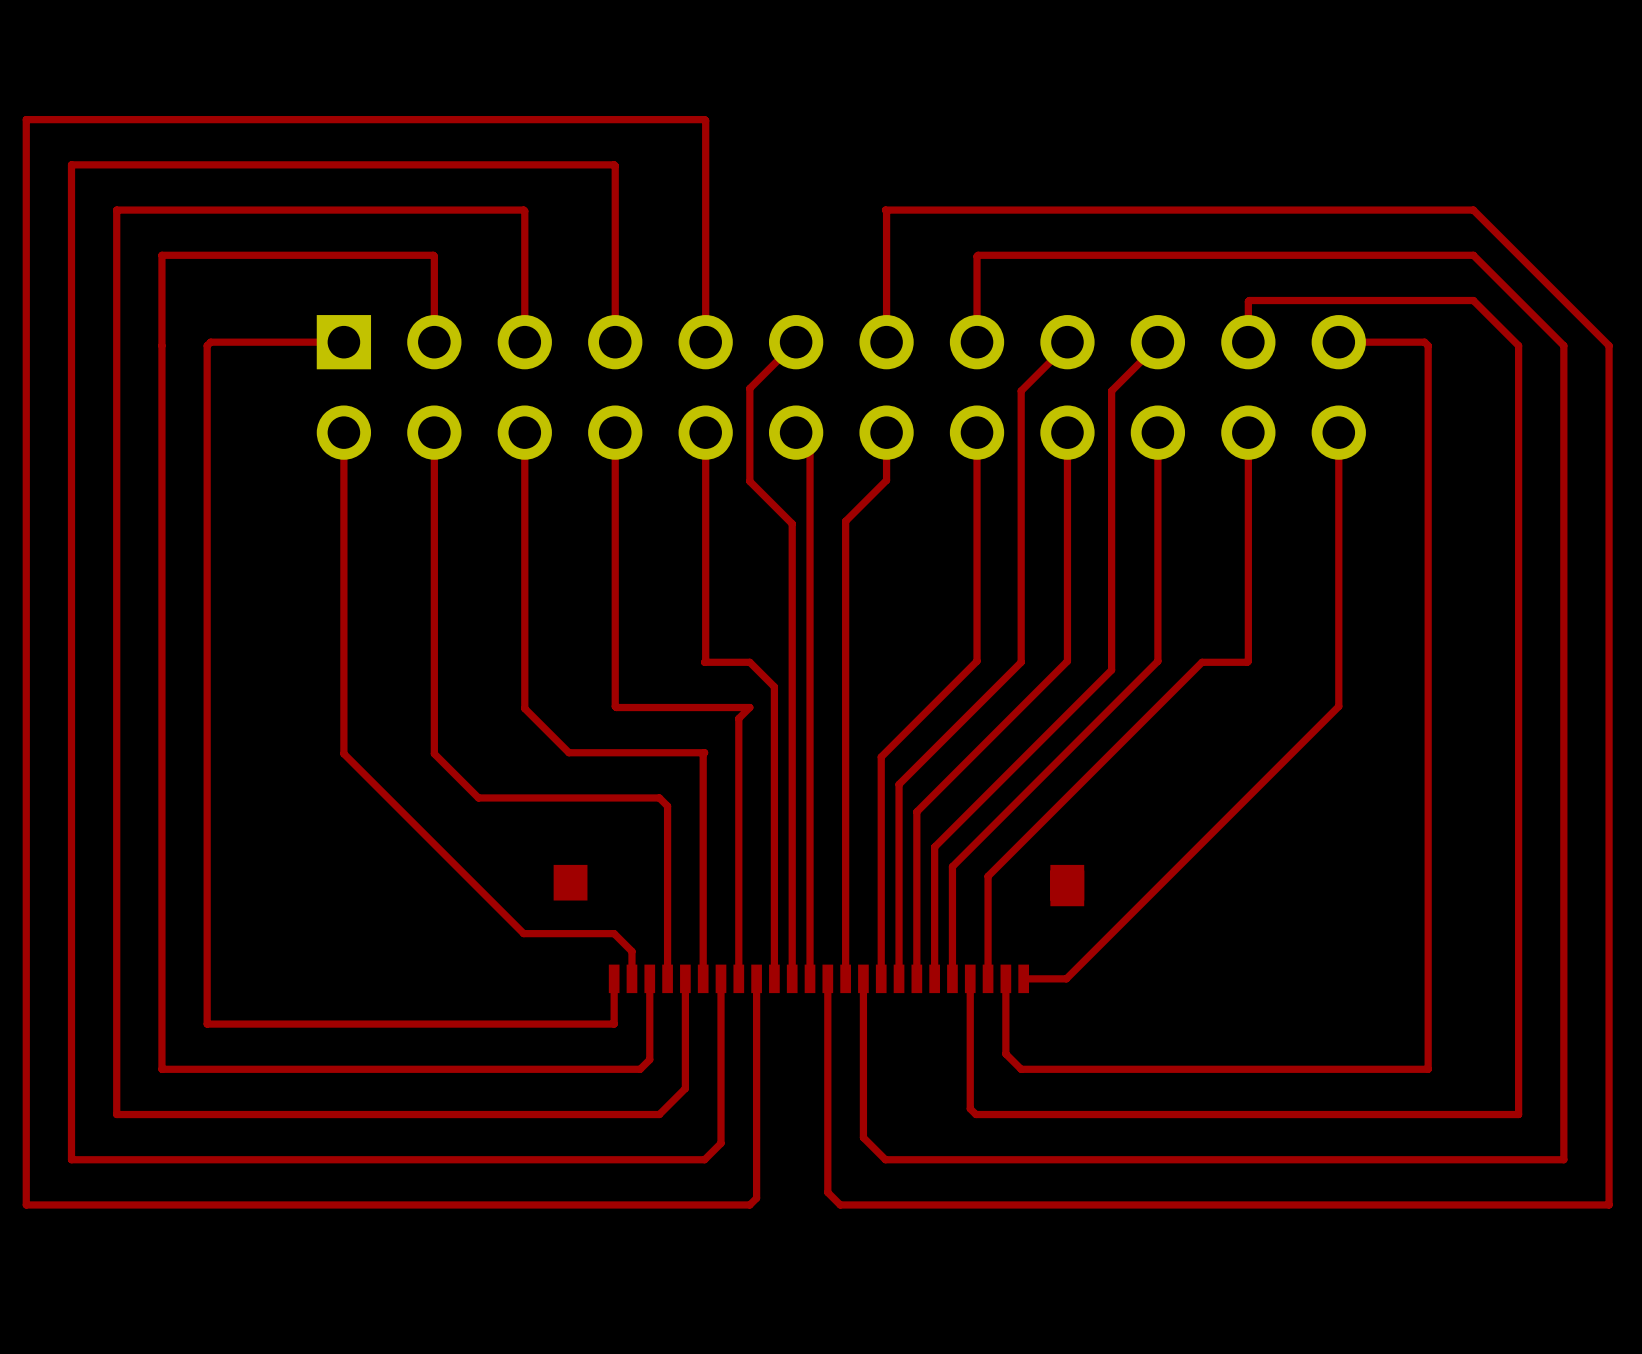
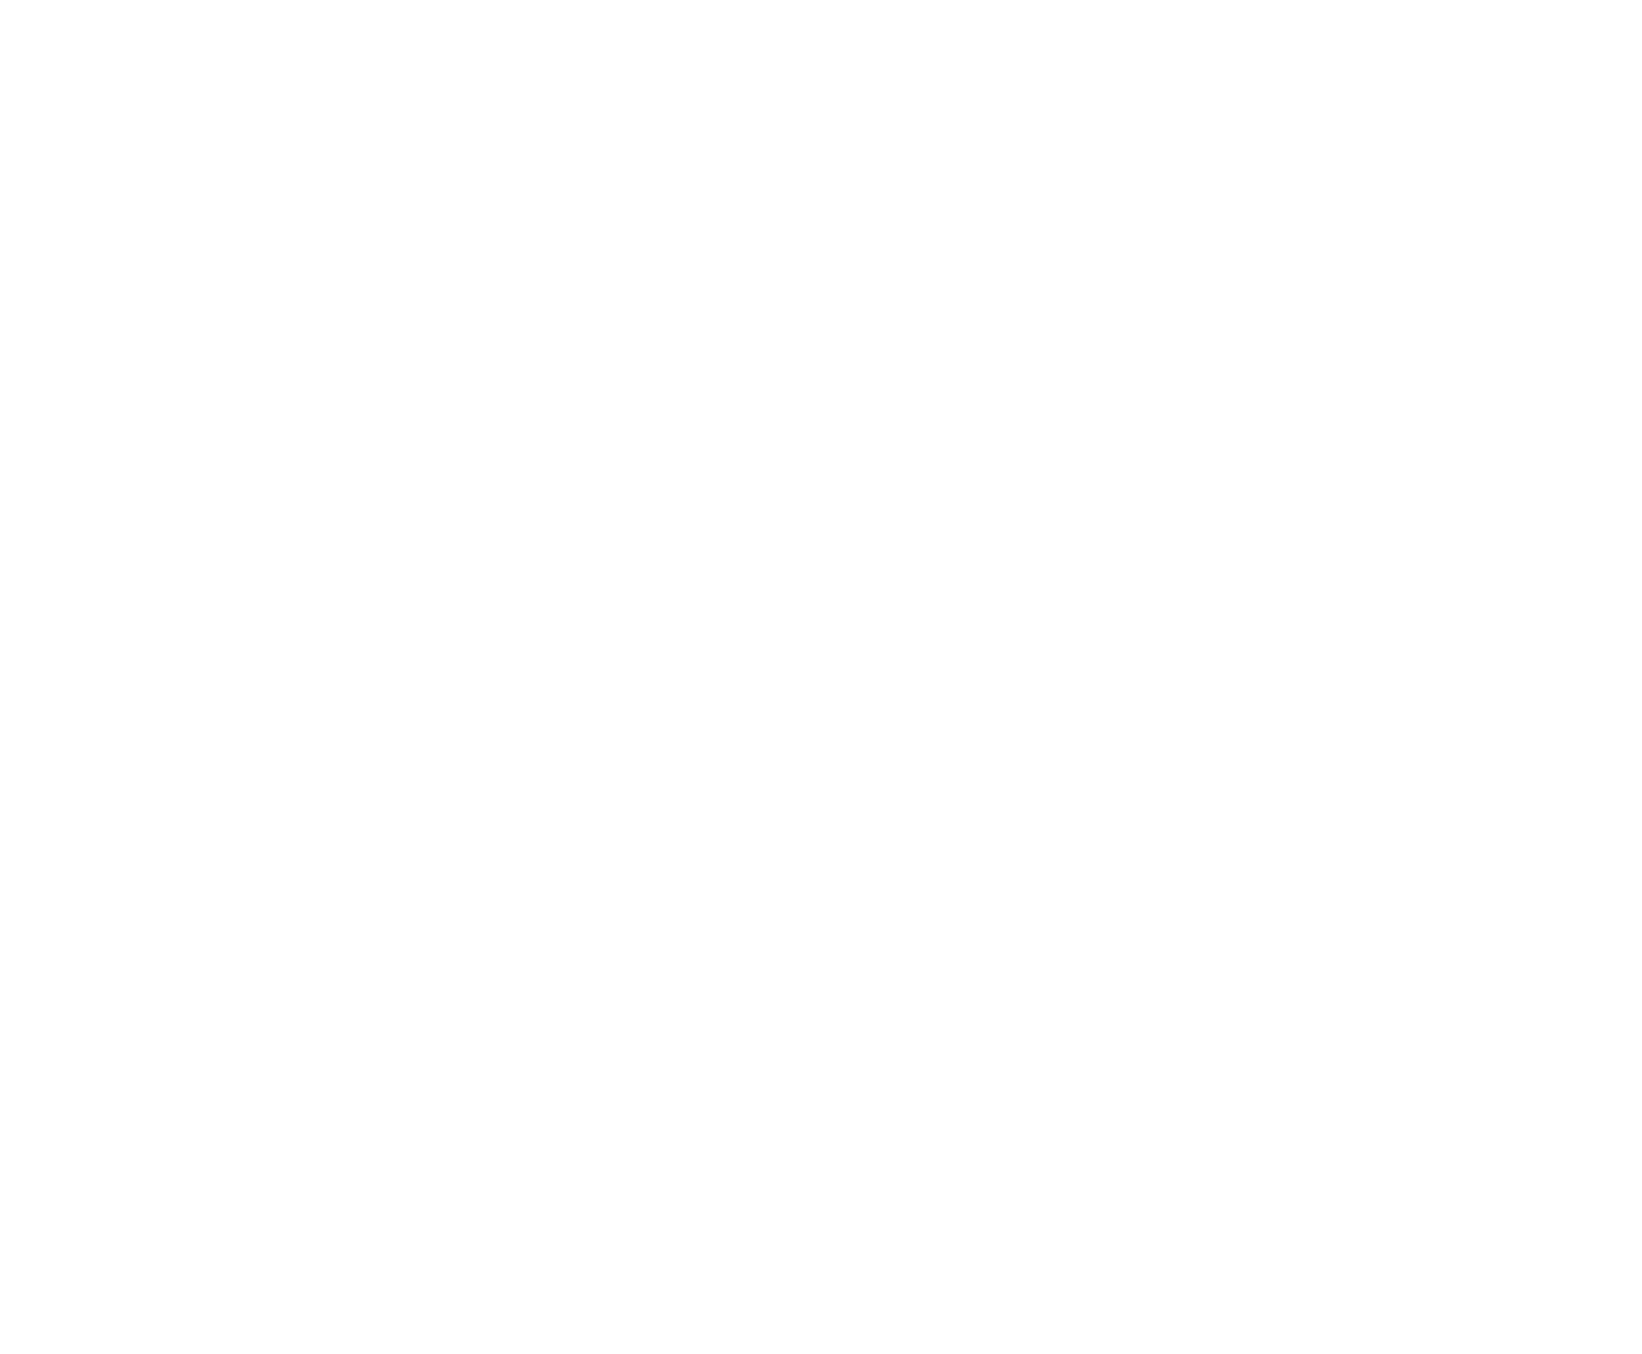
top track: (343, 342) (210, 342) (207, 345) (207, 1024) (614, 1024) (614, 978) -> none
top track: (434, 342) (433, 255) (161, 255) (161, 1069) (640, 1069) (649, 1059) (649, 978) -> none
top track: (524, 342) (523, 210) (116, 210) (116, 1114) (659, 1114) (685, 1088) (685, 978) -> none
top track: (615, 342) (614, 164) (71, 164) (71, 1159) (704, 1159) (720, 1143) (720, 978) -> none
top track: (705, 342) (704, 119) (26, 119) (26, 1204) (749, 1204) (756, 1198) (756, 978) -> none
top track: (796, 342) (749, 388) (749, 481) (792, 523) (792, 978) -> none
top track: (886, 342) (885, 210) (1473, 210) (1609, 345) (1609, 1204) (840, 1204) (827, 1192) (827, 978) -> none
top track: (977, 342) (978, 255) (1473, 255) (1563, 345) (1563, 1159) (885, 1159) (863, 1137) (863, 978) -> none
top track: (1067, 342) (1067, 344) (1021, 390) (1021, 662) (899, 784) (899, 978) -> none
top track: (1157, 342) (1157, 344) (1111, 390) (1111, 670) (934, 847) (934, 978) -> none
top track: (1248, 342) (1249, 300) (1473, 300) (1518, 345) (1518, 1114) (975, 1114) (970, 1108) (970, 978) -> none
top track: (1338, 342) (1424, 342) (1428, 345) (1428, 1069) (1021, 1069) (1005, 1053) (1005, 978) -> none
part: (841, 387) -> none
top track: (343, 432) (343, 753) (523, 933) (614, 933) (631, 951) (631, 978) -> none
top track: (434, 432) (434, 753) (478, 797) (659, 797) (667, 806) (667, 978) -> none
top track: (524, 432) (524, 708) (568, 752) (704, 752) (703, 978) -> none
top track: (615, 432) (615, 706) (749, 707) (738, 718) (738, 978) -> none
top track: (705, 432) (704, 662) (749, 662) (774, 686) (774, 978) -> none
top track: (796, 432) (810, 446) (810, 978) -> none
top track: (886, 432) (886, 480) (845, 521) (845, 978) -> none
top track: (977, 432) (977, 661) (881, 757) (881, 978) -> none
top track: (1067, 432) (1067, 661) (916, 811) (916, 978) -> none
top track: (1157, 432) (1157, 661) (952, 866) (952, 978) -> none
top track: (1248, 432) (1248, 661) (1202, 662) (988, 876) (988, 978) -> none
top track: (1338, 432) (1338, 706) (1066, 978) (1023, 978) -> none
part: (818, 929) -> none

